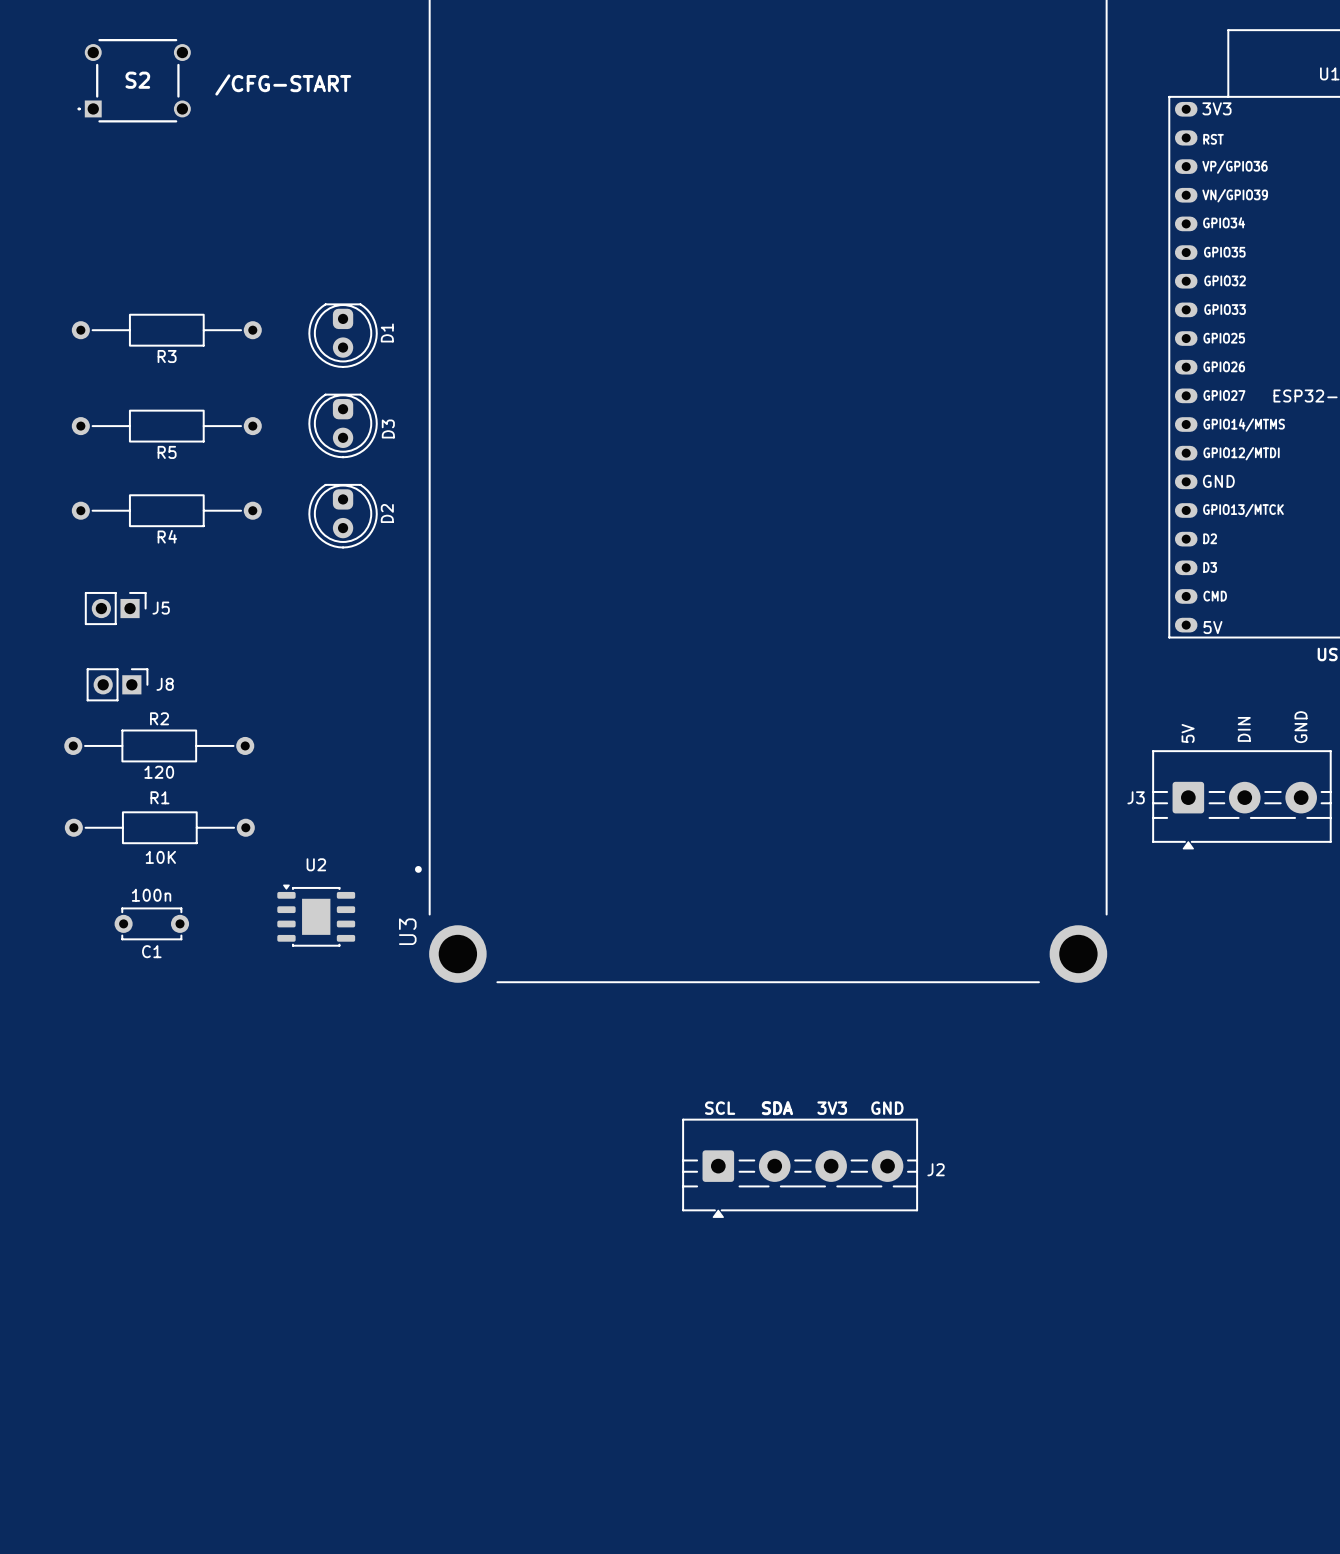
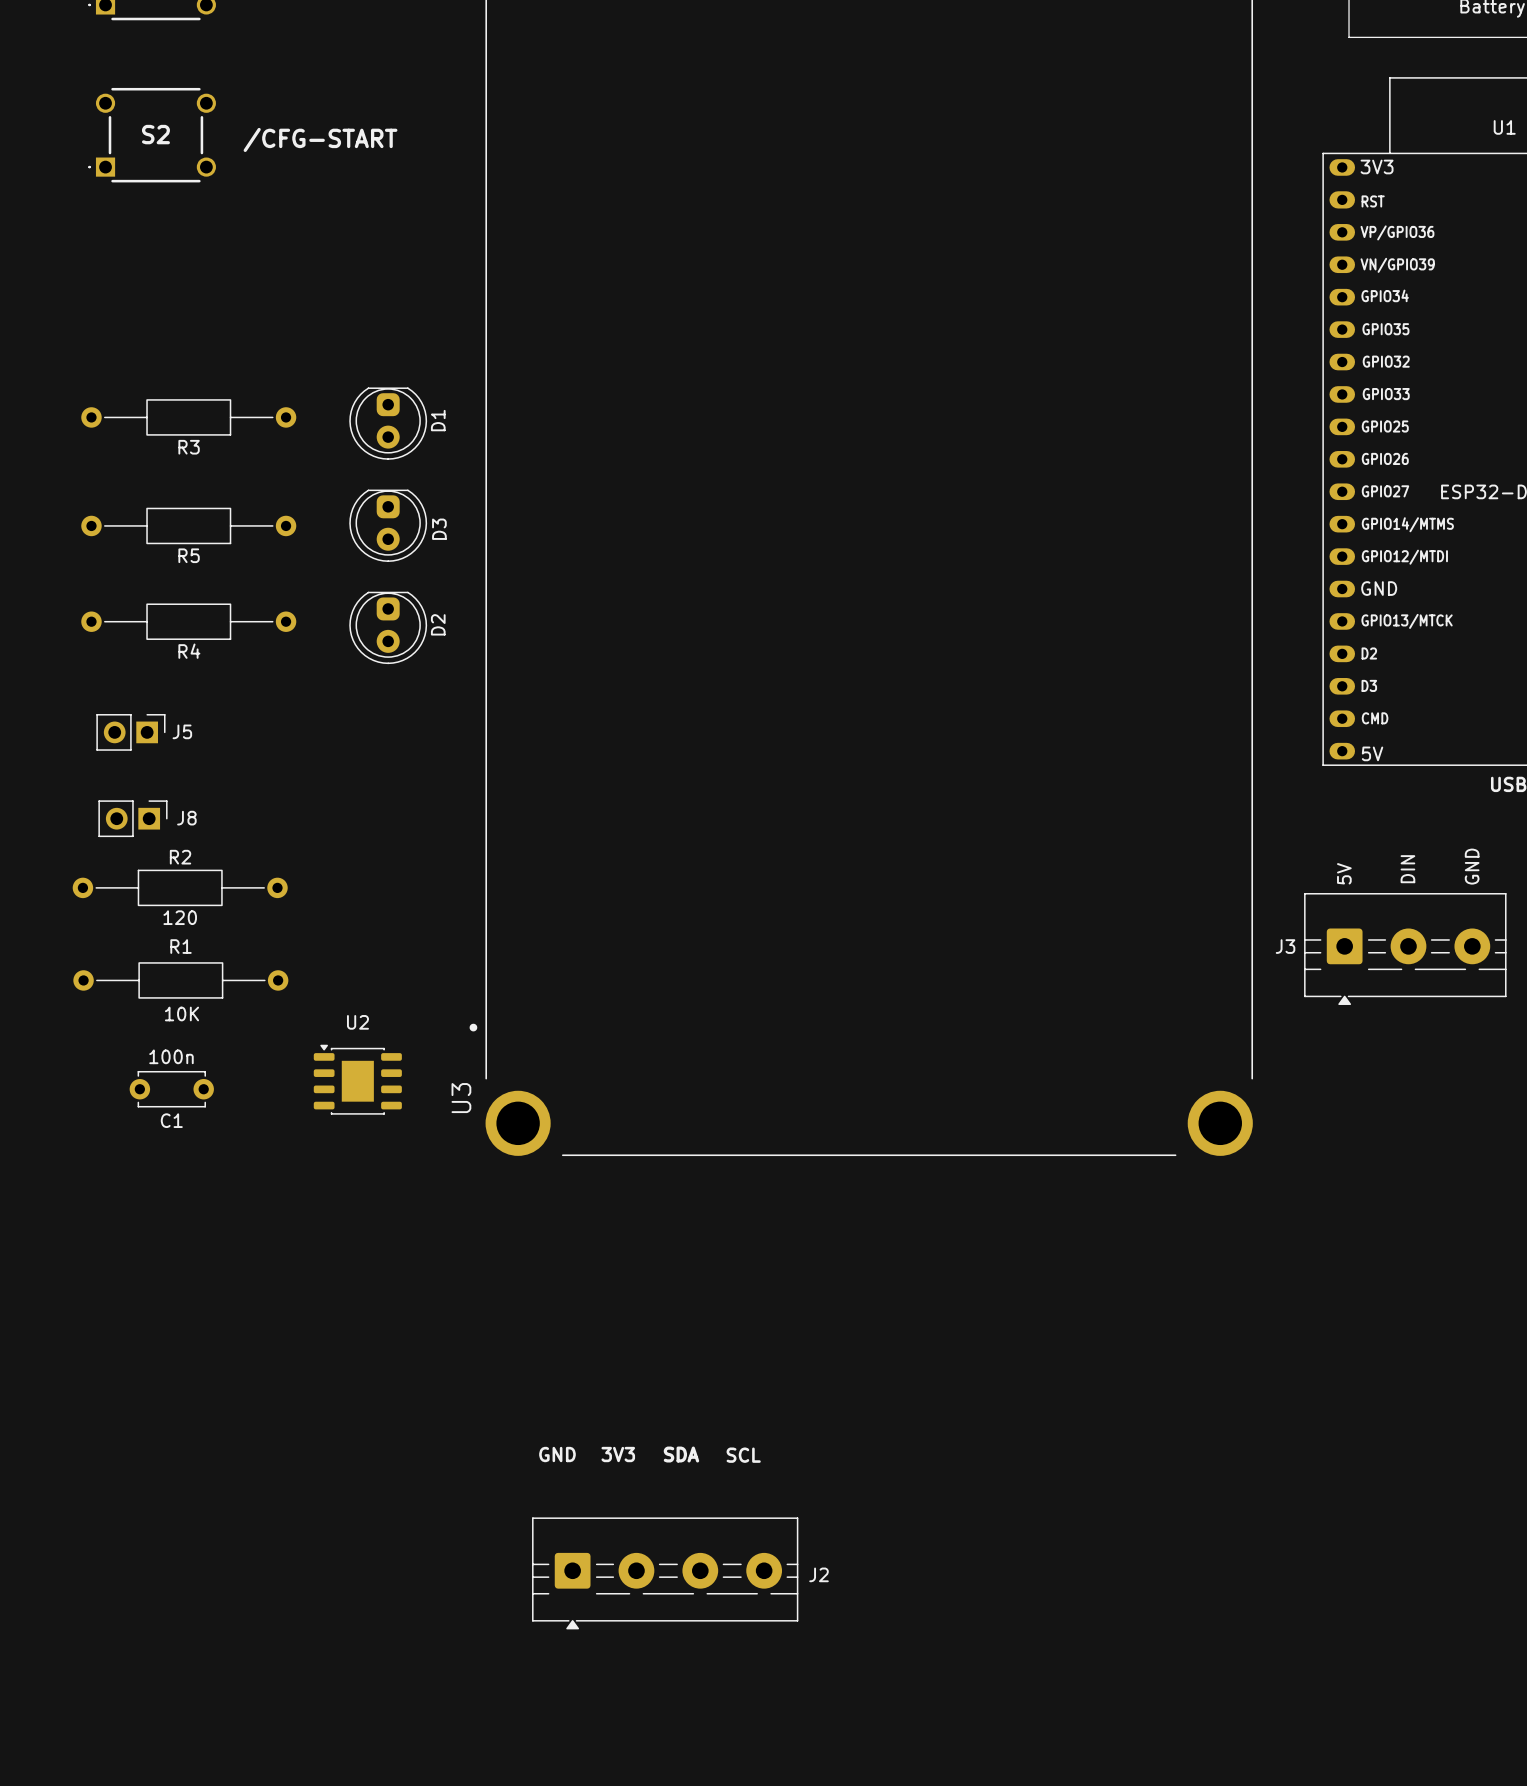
text position: SCL (720, 1108) -> SCL (743, 1455)
text position: SDA (777, 1108) -> SDA (681, 1454)
text: 3V3 (832, 1108) -> none
text: GND (887, 1108) -> none
J2 position: (800, 1168) -> (665, 1573)
text: none -> GND (557, 1454)
text: none -> 3V3 (618, 1454)

